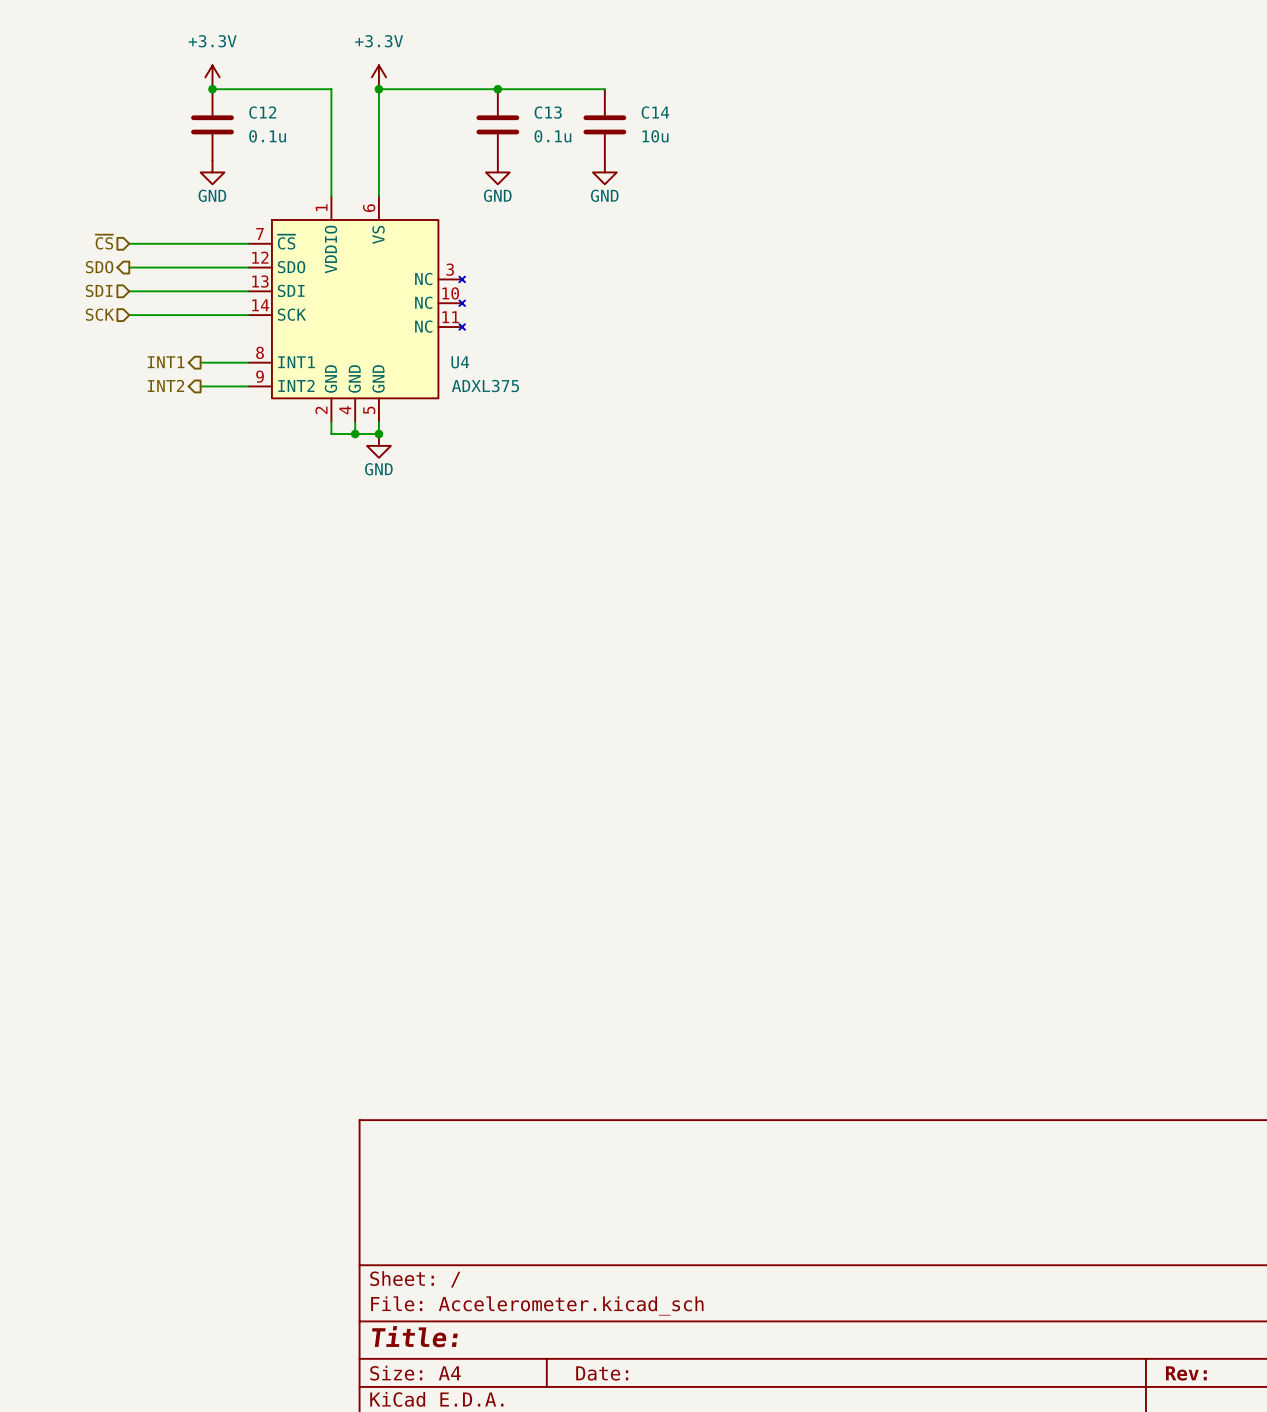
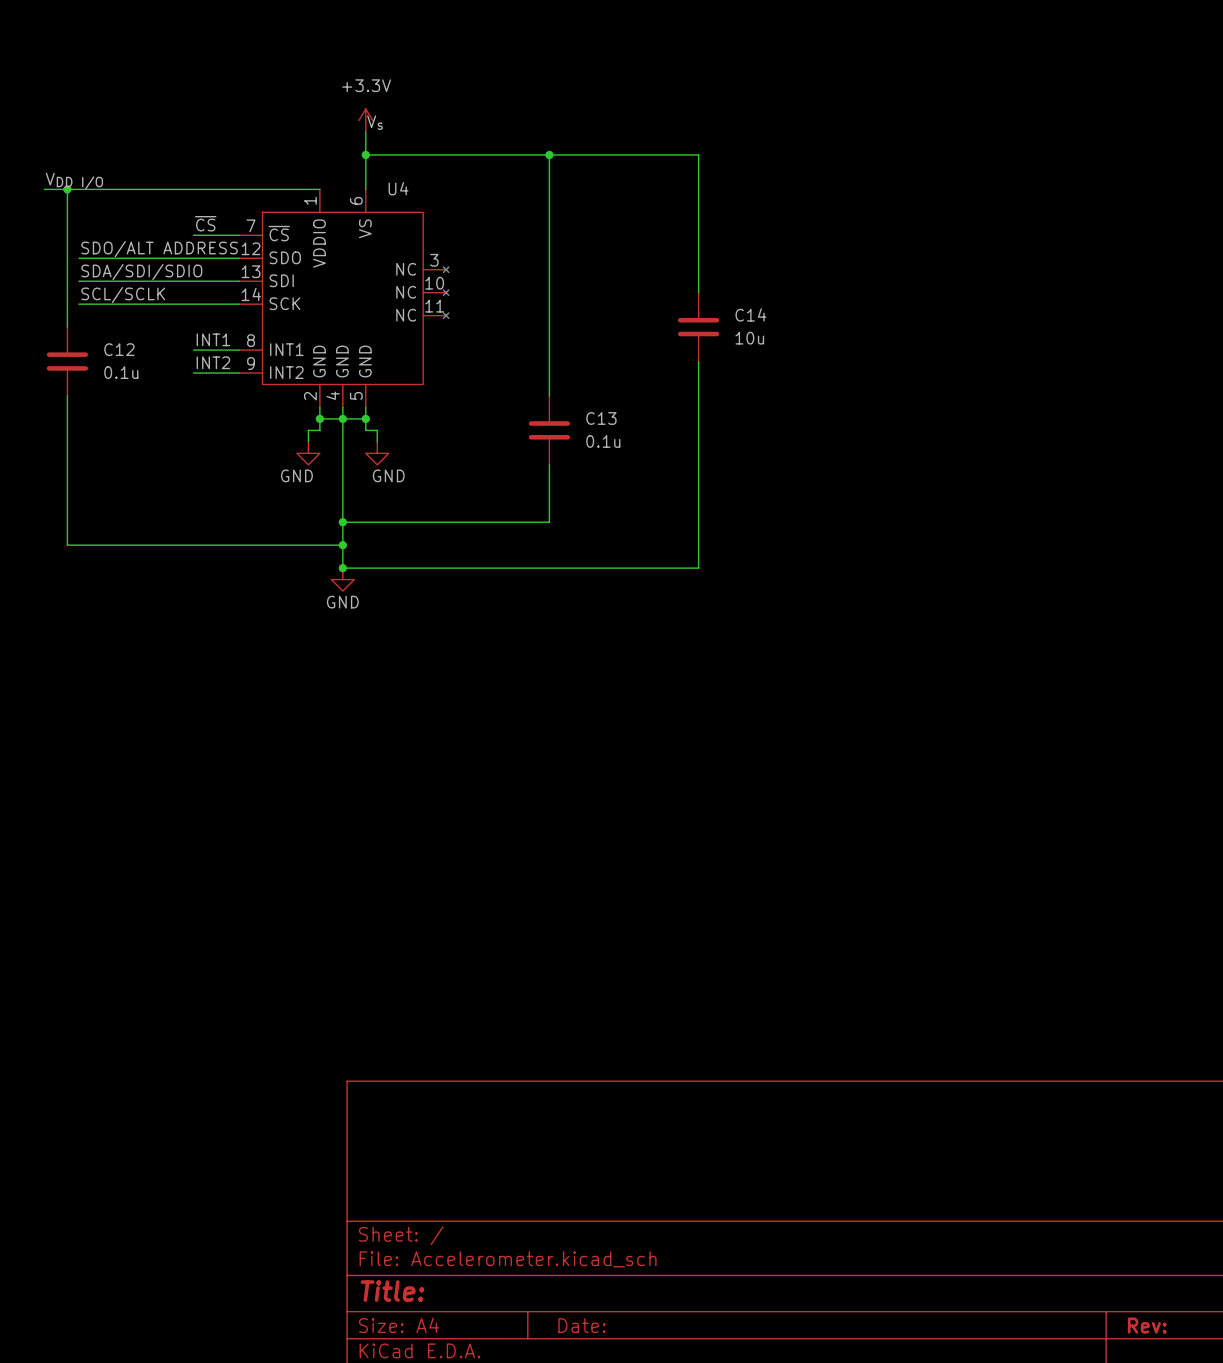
power symbol: +3.3V (212, 77) -> none
power symbol position: +3.3V (378, 77) -> +3.3V (365, 120)
wire: (212, 89) (331, 89) (331, 196) -> (44, 189) (319, 189)
junction: (212, 89) -> none
junction: (378, 89) -> none
junction: (497, 89) -> none
wire: (604, 89) (378, 89) (378, 136) -> none
C12 position: (212, 124) -> (67, 361)
C13 position: (497, 124) -> (549, 430)
C14 position: (604, 124) -> (698, 327)
label: none -> Vs (375, 122)
wire: none -> (365, 154) (698, 154) (698, 292)
junction: none -> (365, 154)
wire: none -> (549, 154) (549, 395)
junction: none -> (549, 154)
power symbol: GND (212, 172) -> none
power symbol: GND (497, 172) -> none
power symbol: GND (604, 172) -> none
label: none -> VDD I/O (74, 181)
wire: none -> (67, 189) (67, 327)
junction: none -> (67, 189)
label: none -> ~{CS} (205, 223)
hierarchical label: ~{CS} (104, 242) -> none
wire: (129, 243) (200, 243) -> none
label: none -> SDO/ALT ADDRESS (159, 249)
wire: none -> (78, 258) (124, 258)
hierarchical label: SDO (99, 267) -> none
label: none -> SDA/SDI/SDIO (141, 272)
hierarchical label: SDI (99, 290) -> none
wire: none -> (78, 281) (124, 281)
label: none -> SCL/SCLK (123, 295)
hierarchical label: SCK (99, 314) -> none
wire: none -> (78, 304) (124, 304)
label: none -> INT1 (213, 339)
hierarchical label: INT1 (166, 362) -> none
U4 name position: U4 (460, 362) -> U4 (398, 188)
wire: none -> (698, 361) (698, 568) (342, 568) (342, 418)
label: none -> INT2 (213, 362)
hierarchical label: INT2 (165, 385) -> none
U4 value: ADXL375 (485, 386) -> none
wire: none -> (67, 395) (67, 545) (342, 545)
wire: none -> (319, 418) (319, 430) (308, 430) (308, 441)
junction: none -> (319, 418)
power symbol position: GND (378, 445) -> GND (377, 453)
power symbol: none -> GND (308, 453)
power symbol text position: GND (378, 469) -> GND (388, 475)
wire: none -> (549, 464) (549, 522) (342, 522)
junction: none -> (342, 522)
junction: none -> (342, 545)
junction: none -> (342, 568)
power symbol: none -> GND (342, 579)

